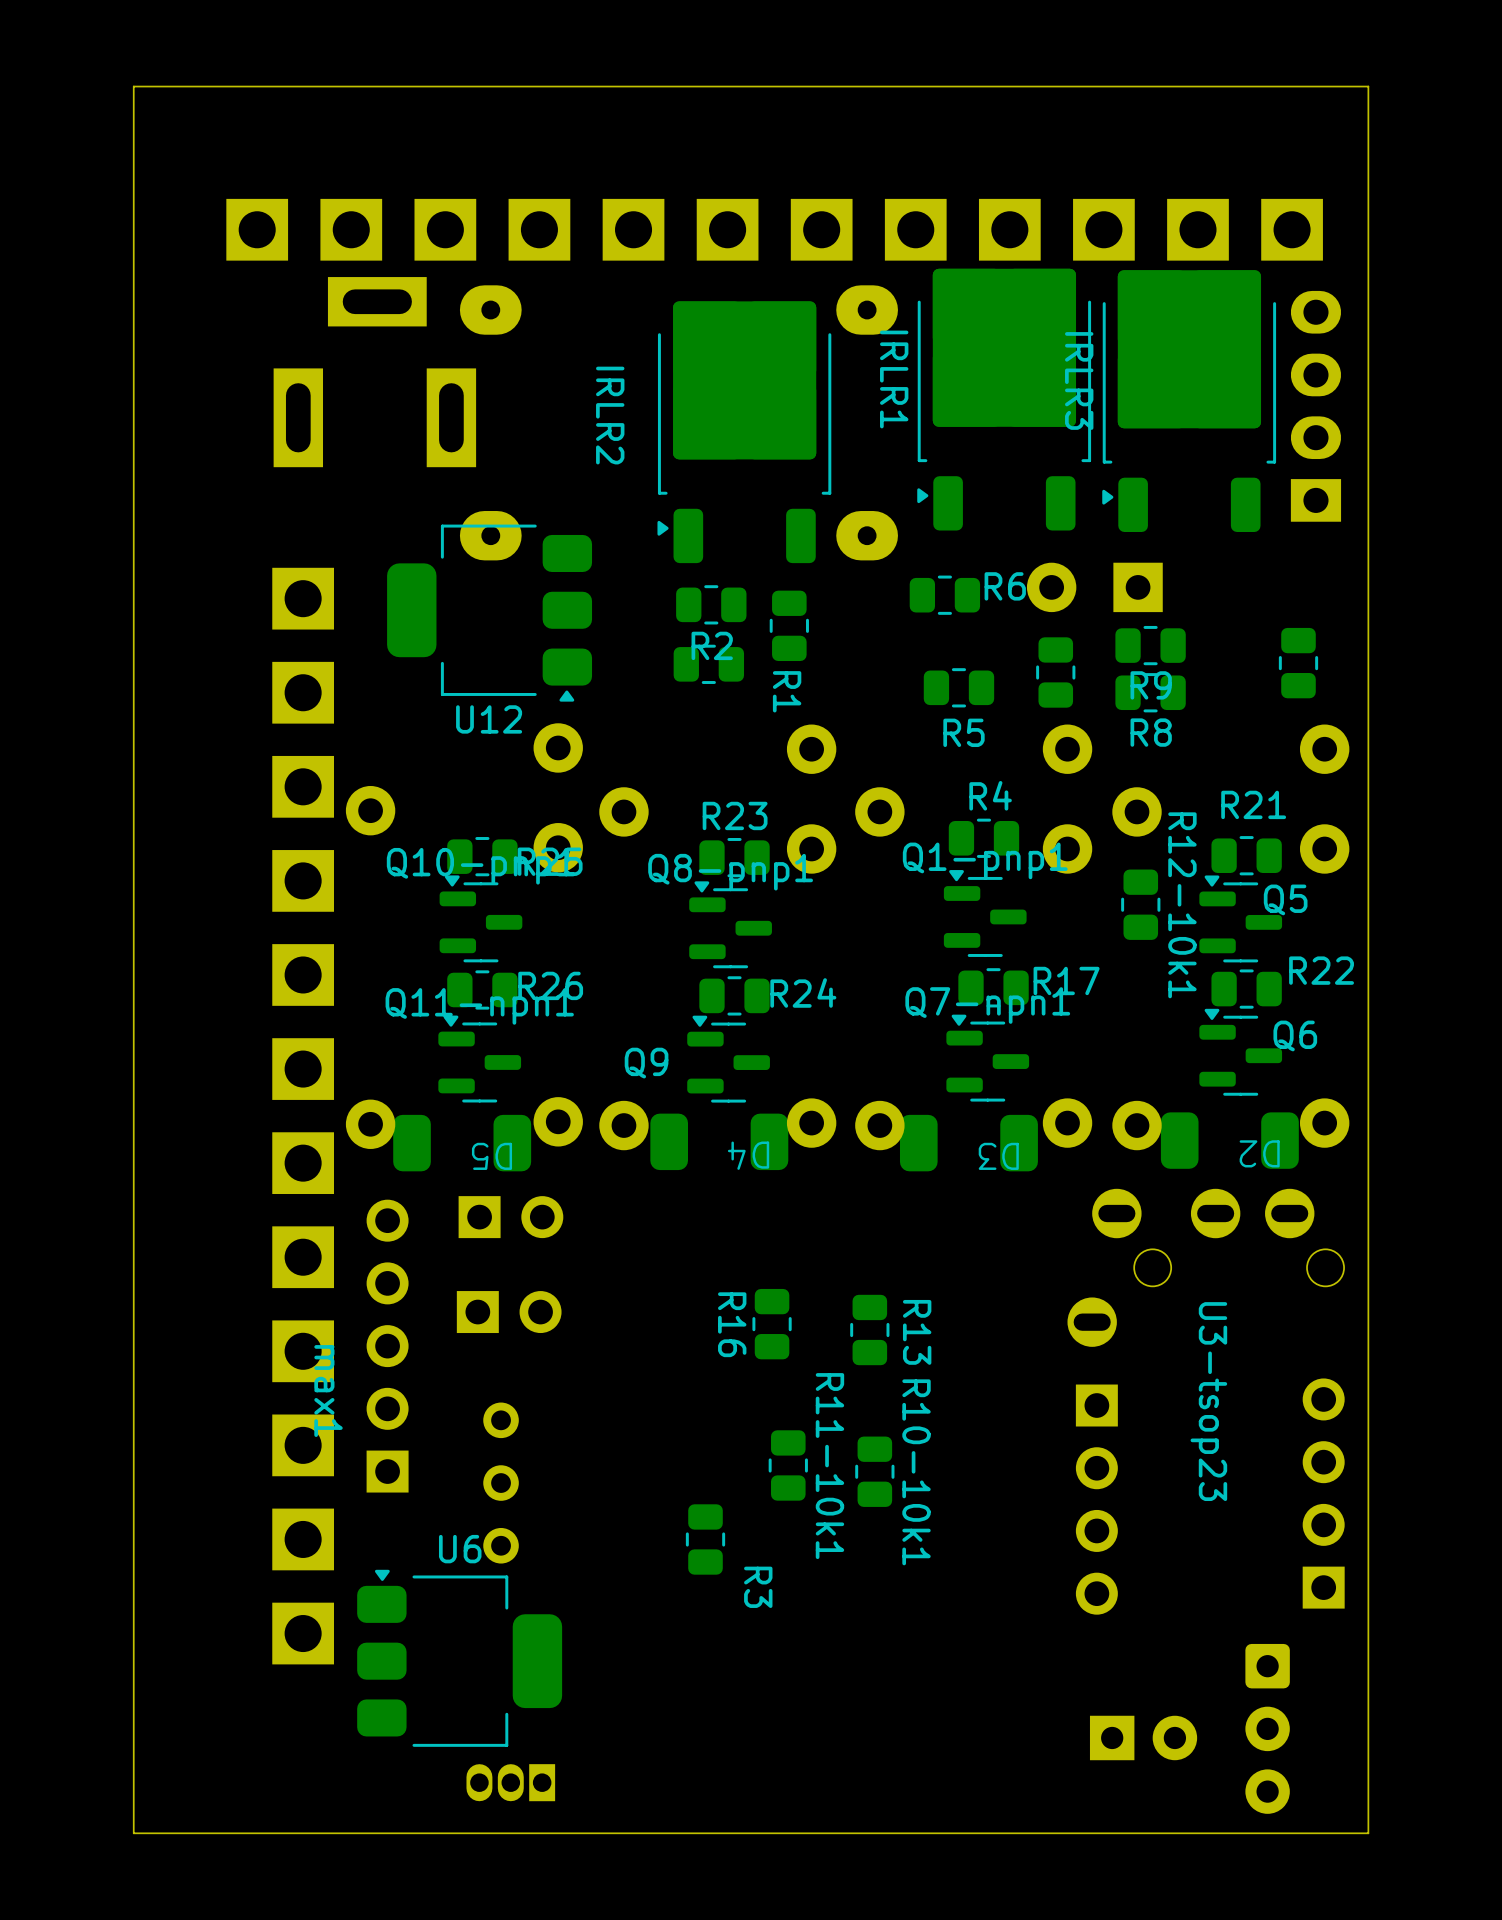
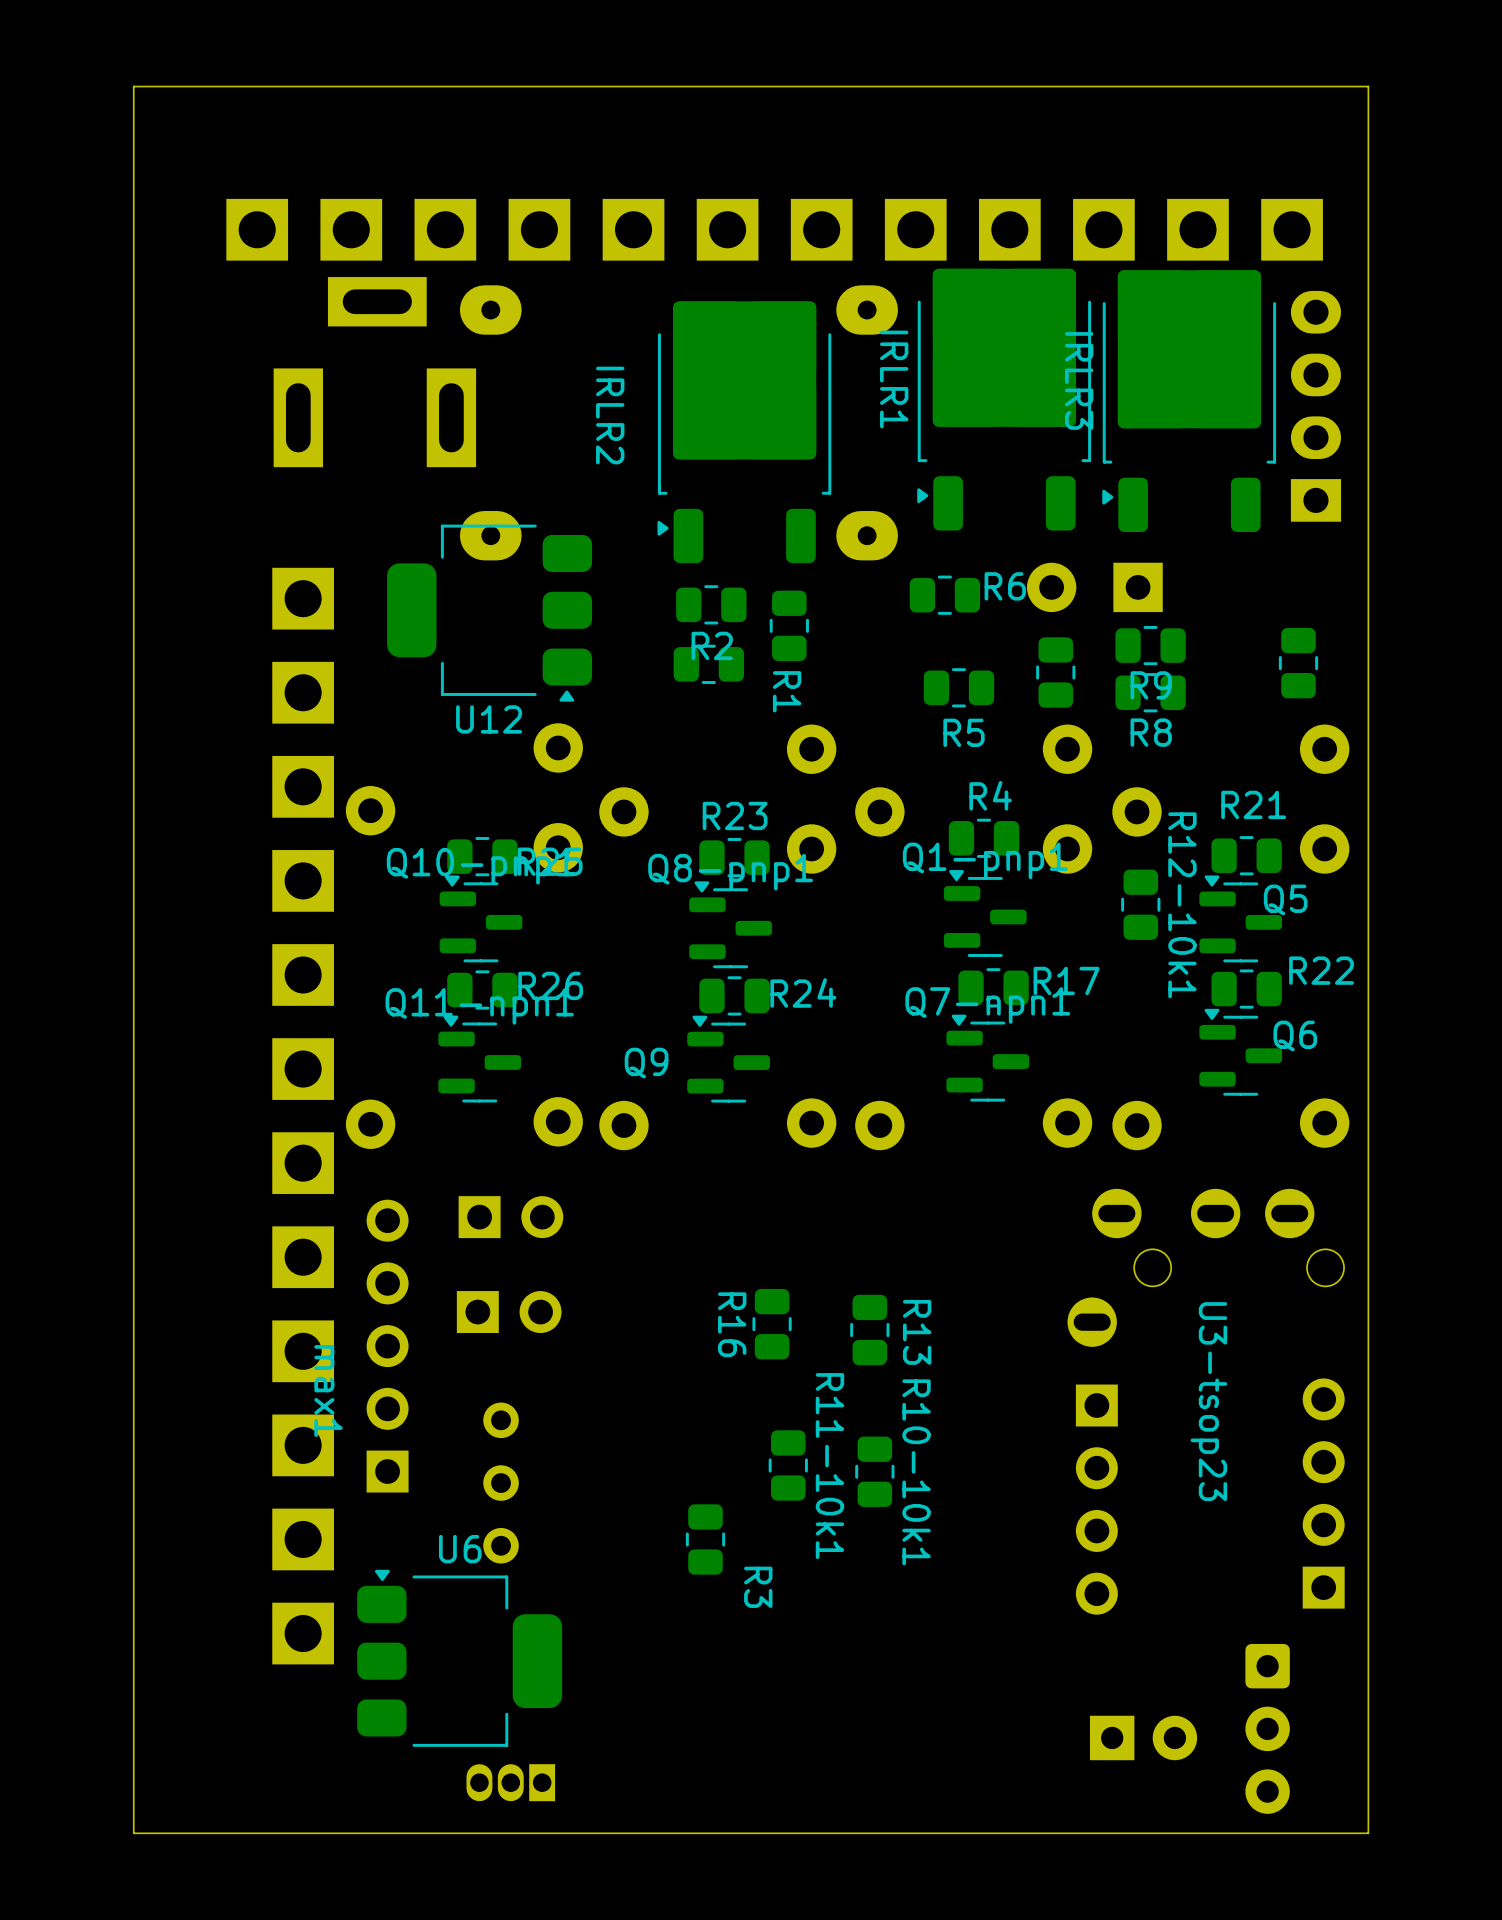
D2: (1229, 1140) -> none
D4: (719, 1141) -> none
D5: (462, 1143) -> none
D3: (968, 1143) -> none

